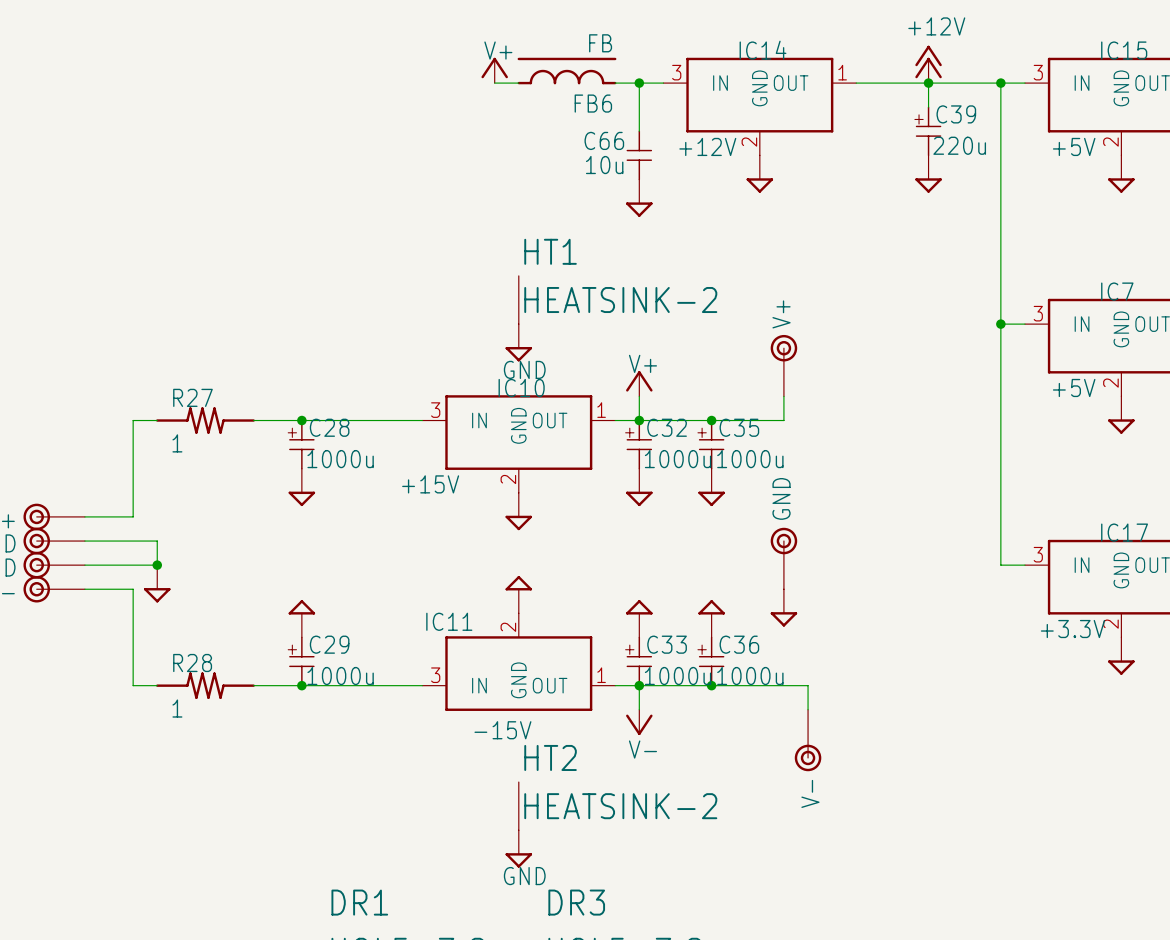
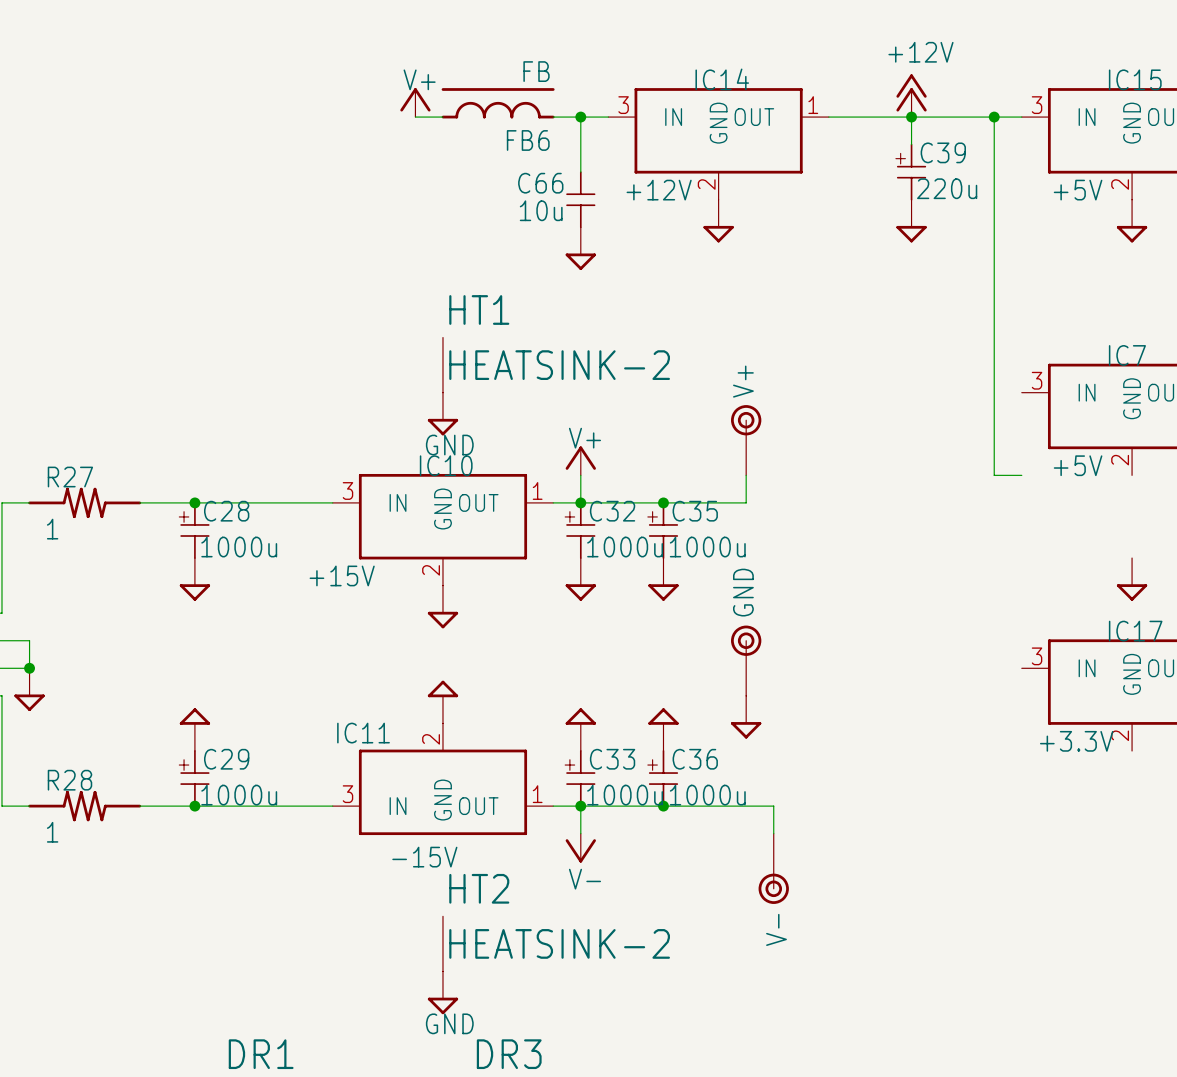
wire: (1000, 324) (1024, 324) -> none
junction: (1000, 324) -> none
wire: (1000, 396) (1000, 565) (1024, 565) -> (994, 475) (1021, 475)
power symbol position: (1121, 415) -> (1132, 579)
power symbol: (1121, 656) -> none

